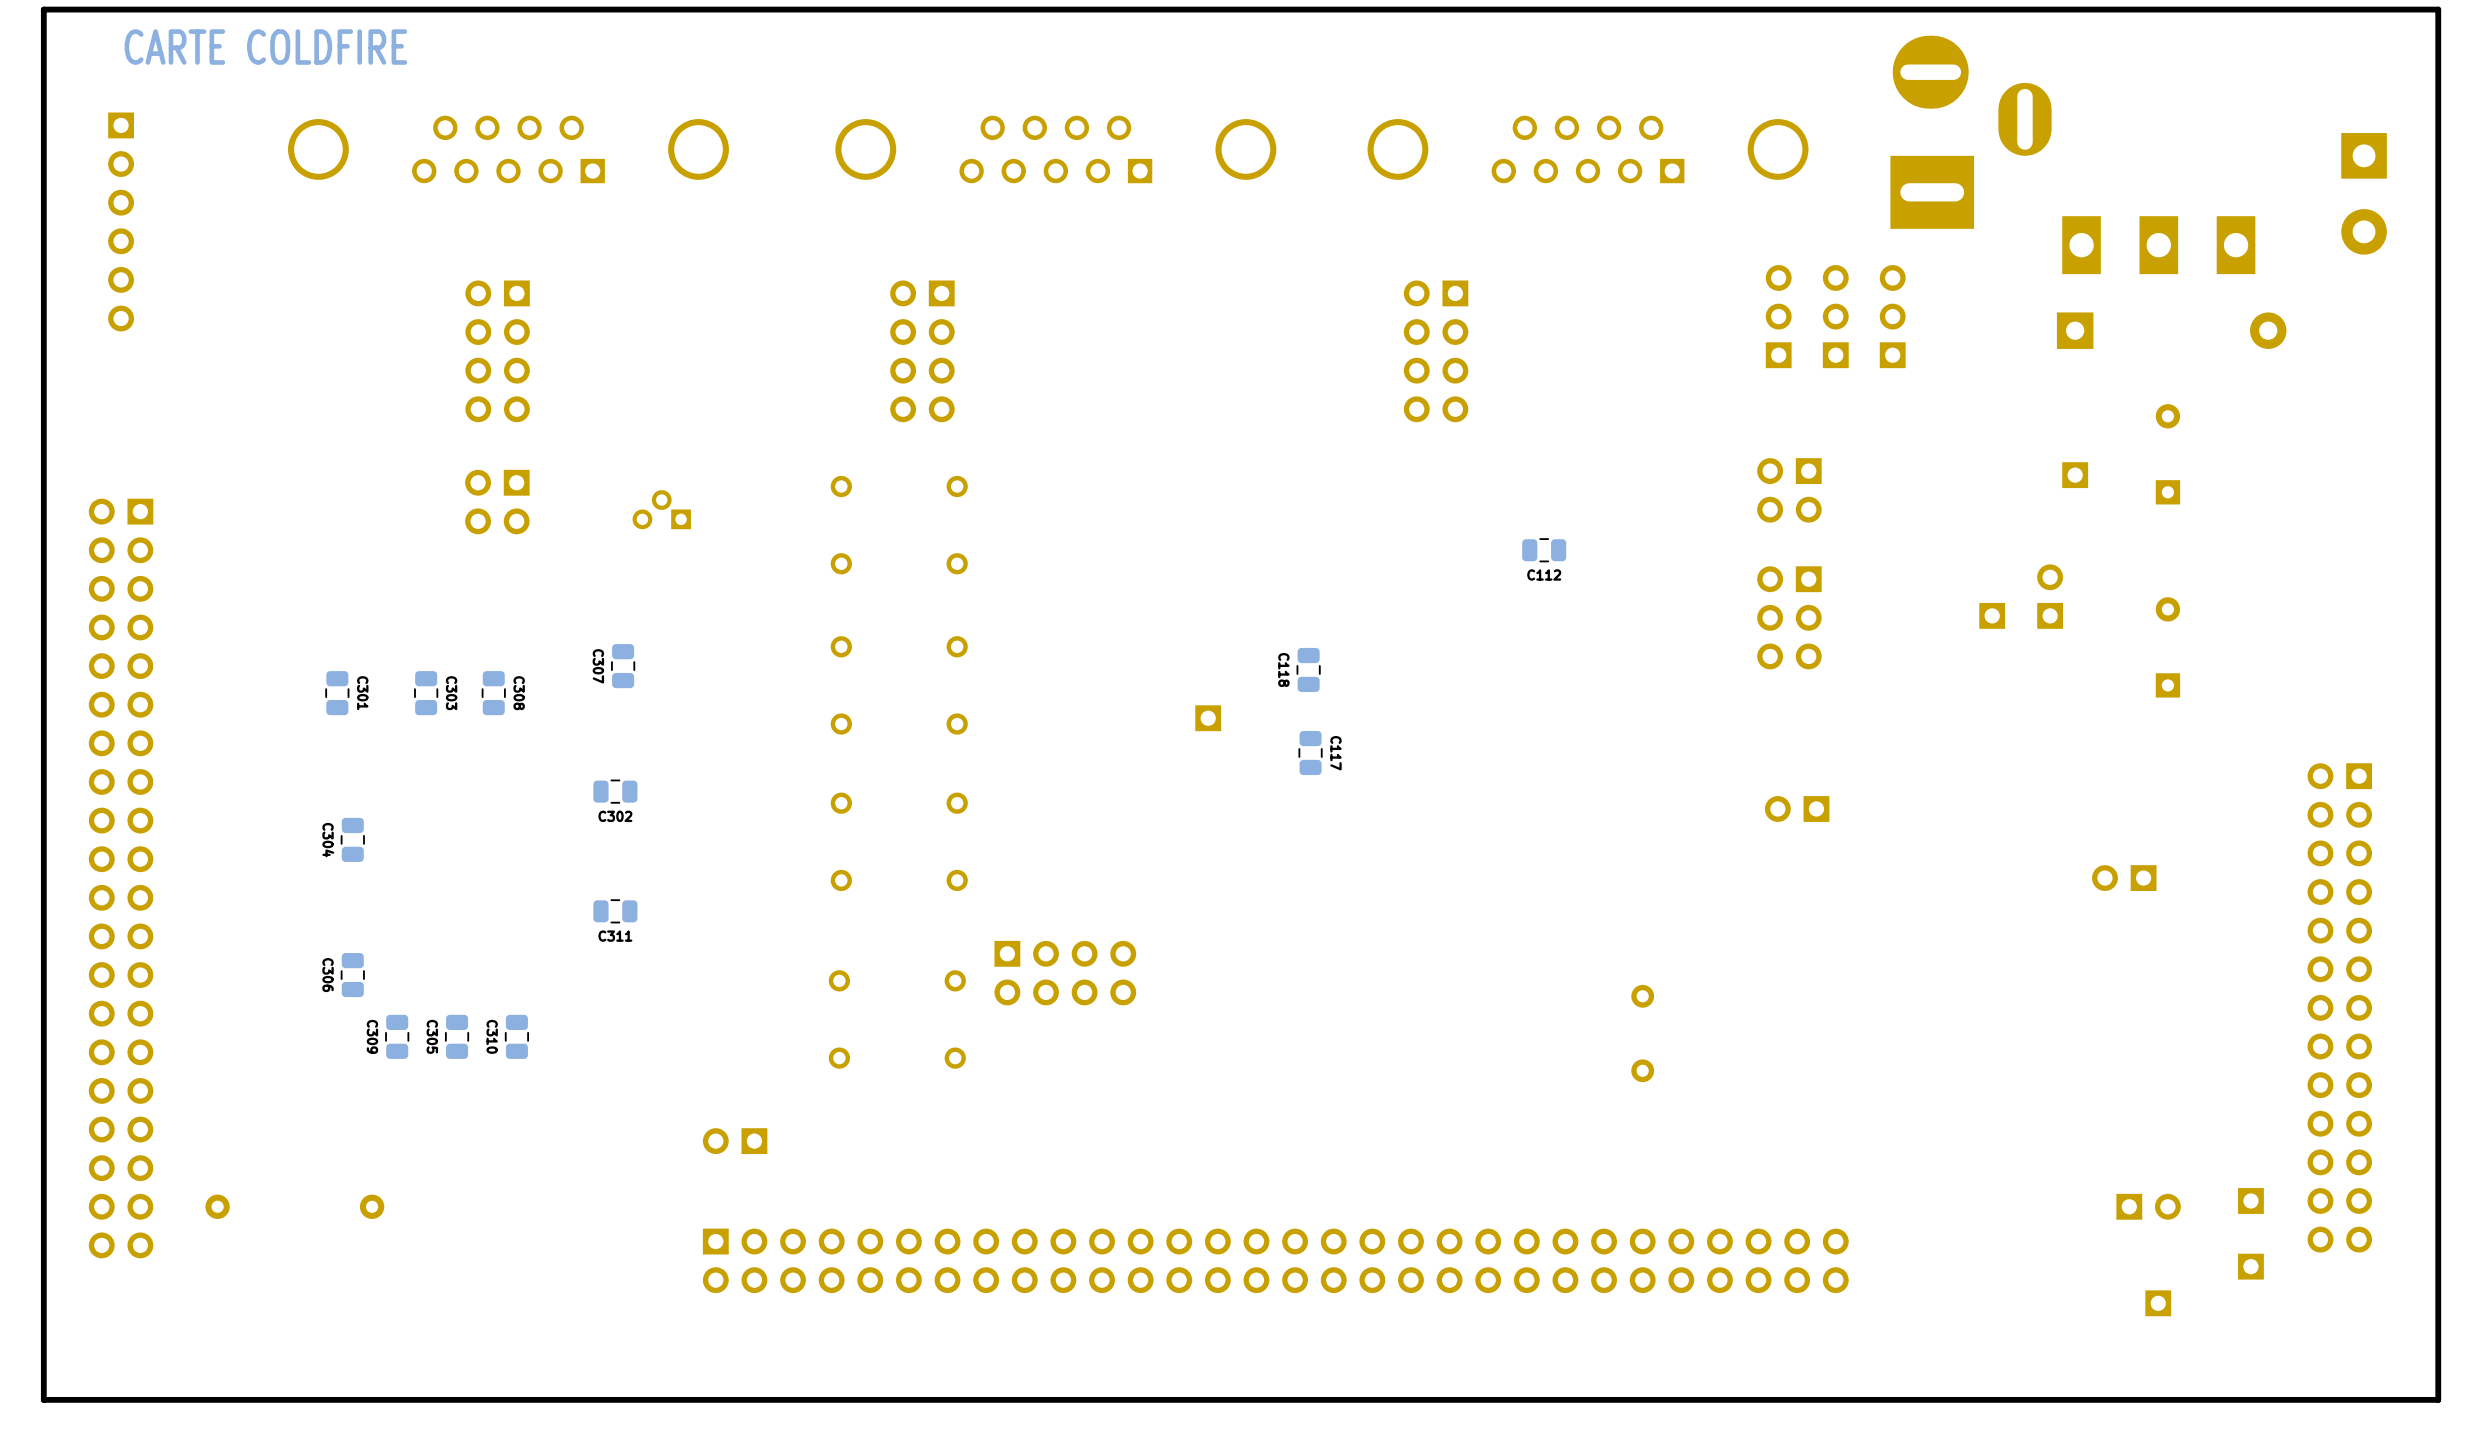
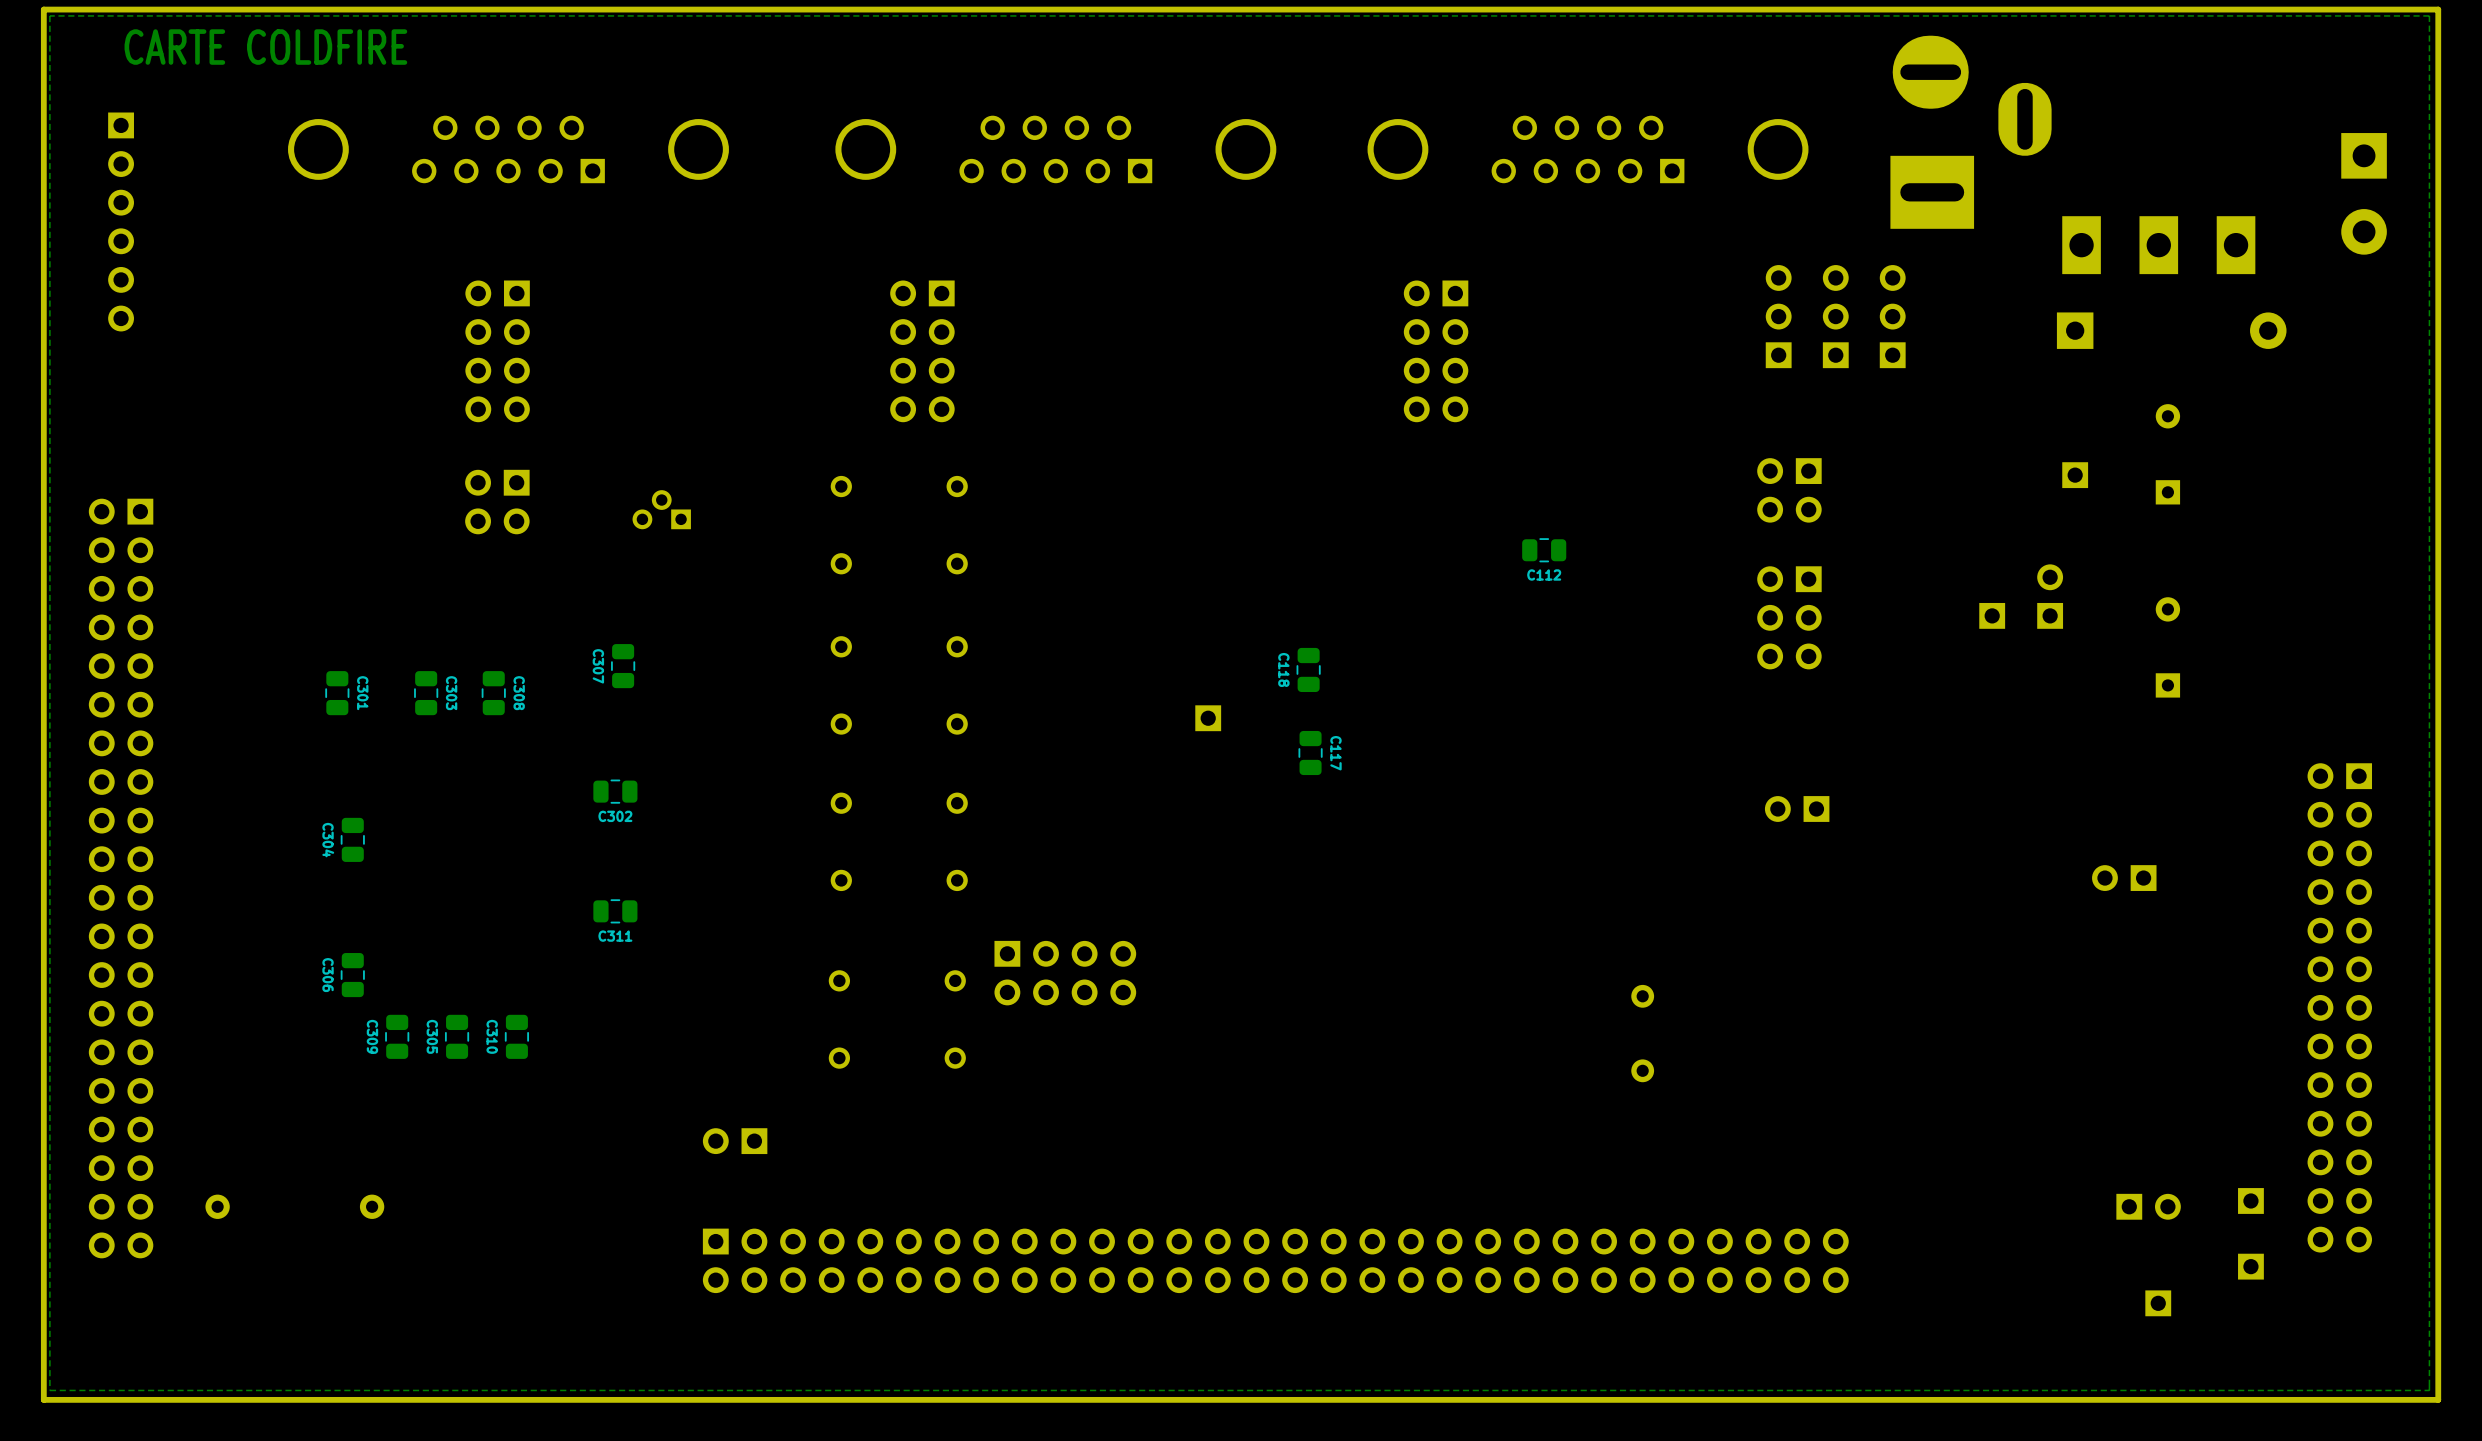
zone outline: none -> (2429, 15) (49, 15) (49, 1390) (2429, 1390) (2429, 15)

